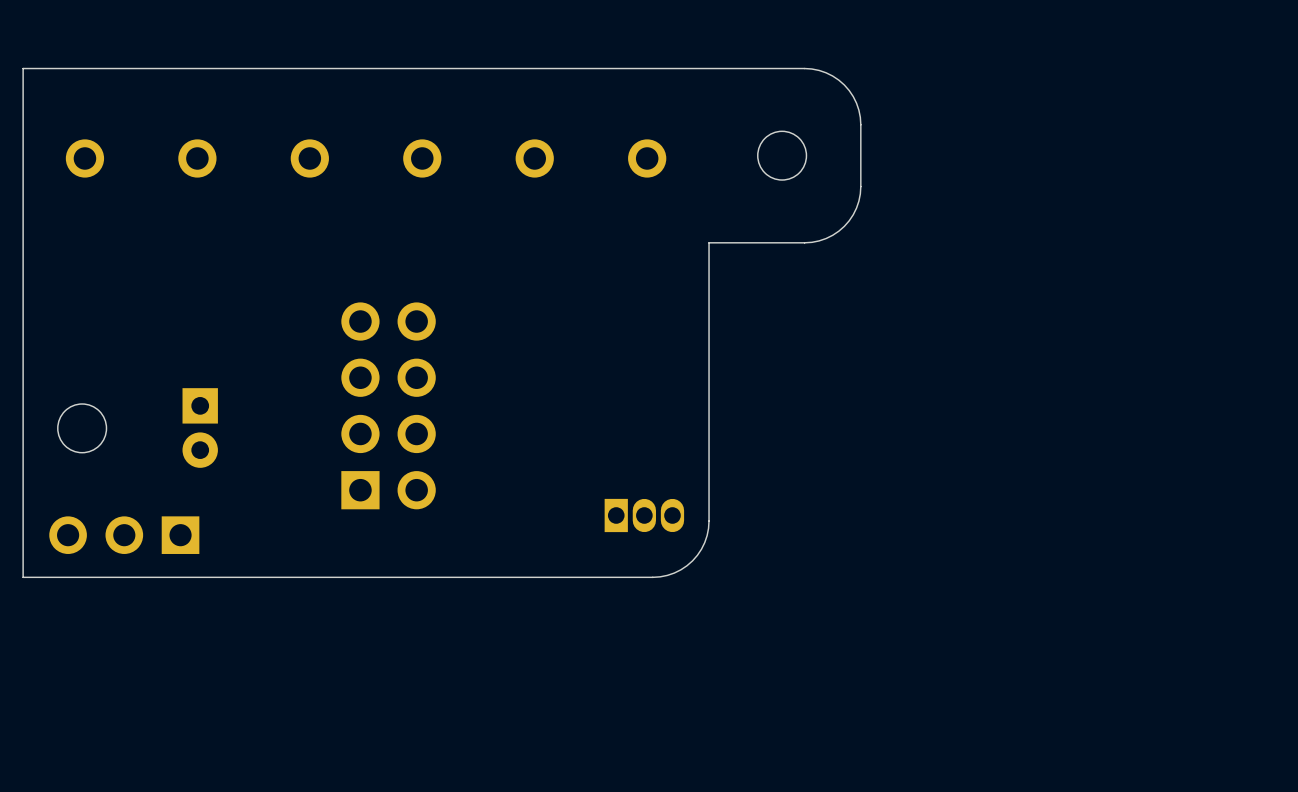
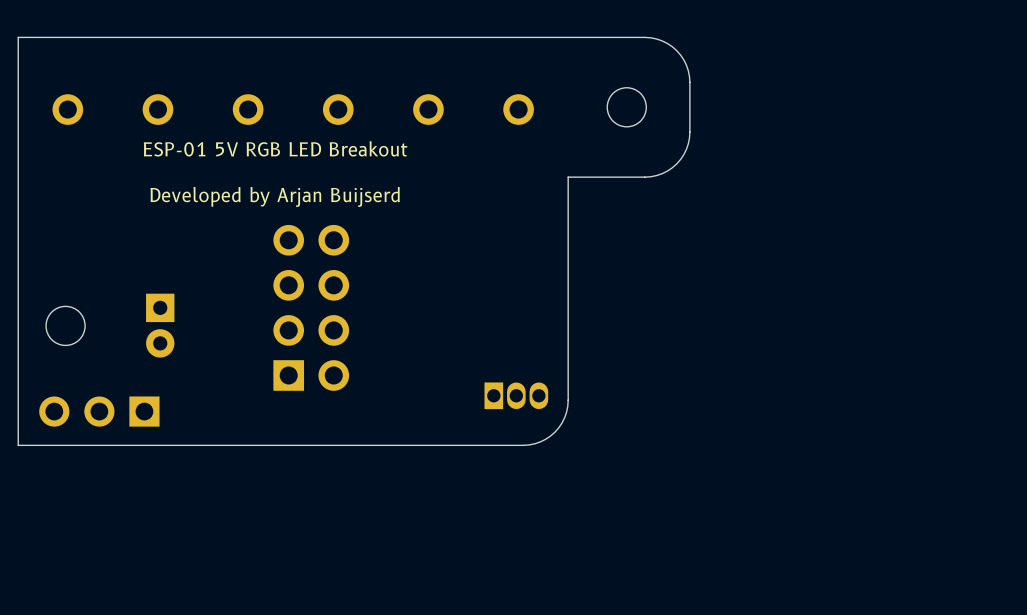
text: none -> ESP-01 5V RGB LED Breakout (275, 148)
text: none -> Developed by Arjan Buijserd (275, 196)

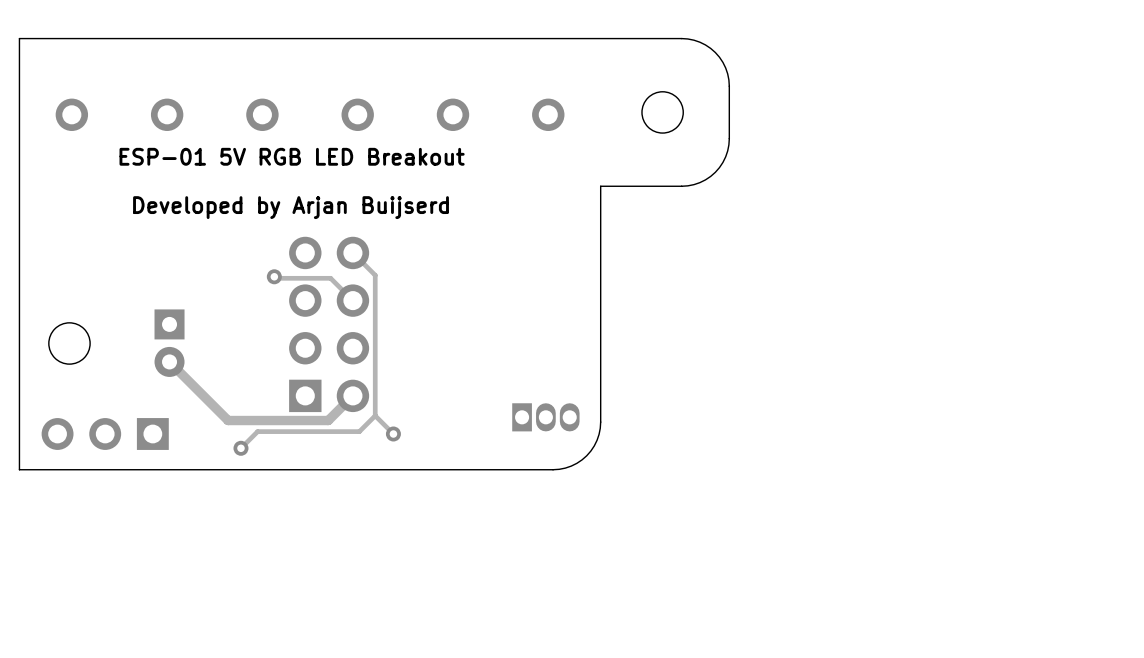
track: none -> (352, 252) (375, 275) (375, 415)
track: none -> (274, 276) (330, 278) (352, 300)
via: none -> (274, 276)
track: none -> (169, 361) (228, 420) (328, 420) (352, 395)
track: none -> (375, 415) (393, 434)
track: none -> (375, 415) (359, 431) (257, 431) (240, 448)
via: none -> (393, 434)
via: none -> (240, 448)

